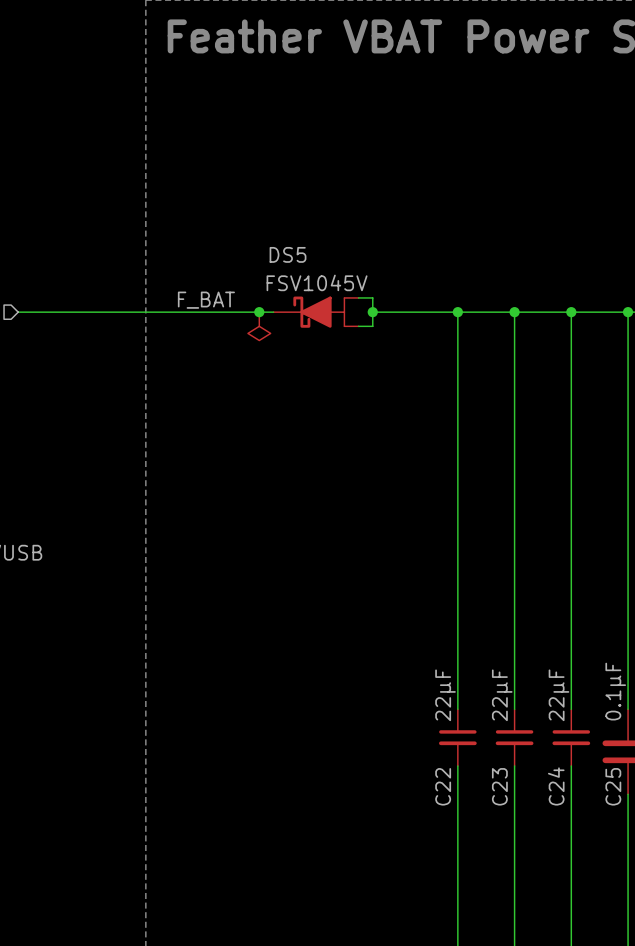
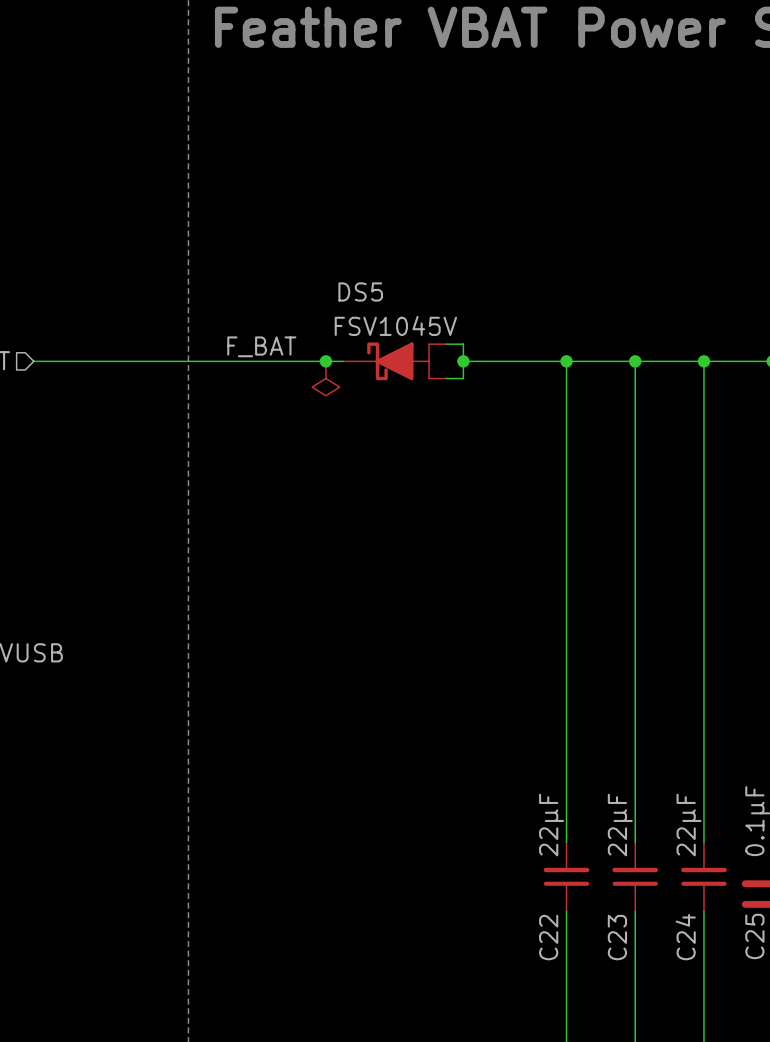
C22 rotation: 0° (457, 737) -> 180° (566, 876)
C23 rotation: 0° (514, 737) -> 180° (635, 876)
C24 rotation: 0° (571, 737) -> 180° (703, 876)

